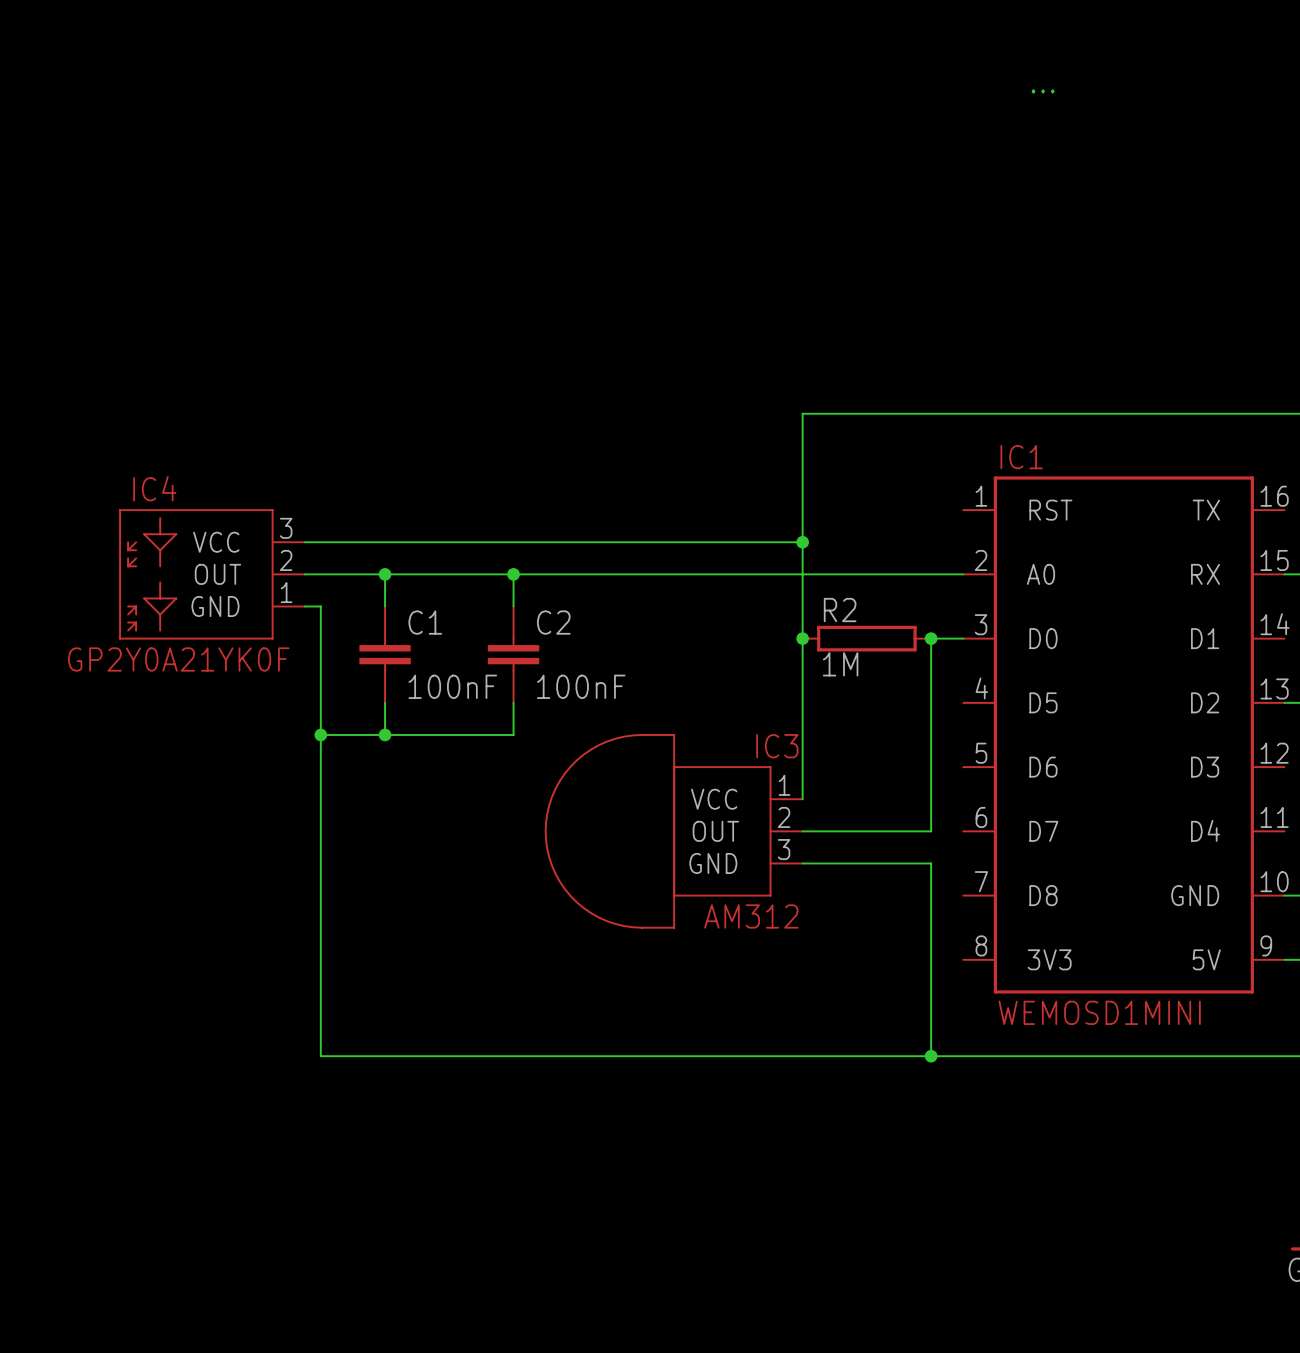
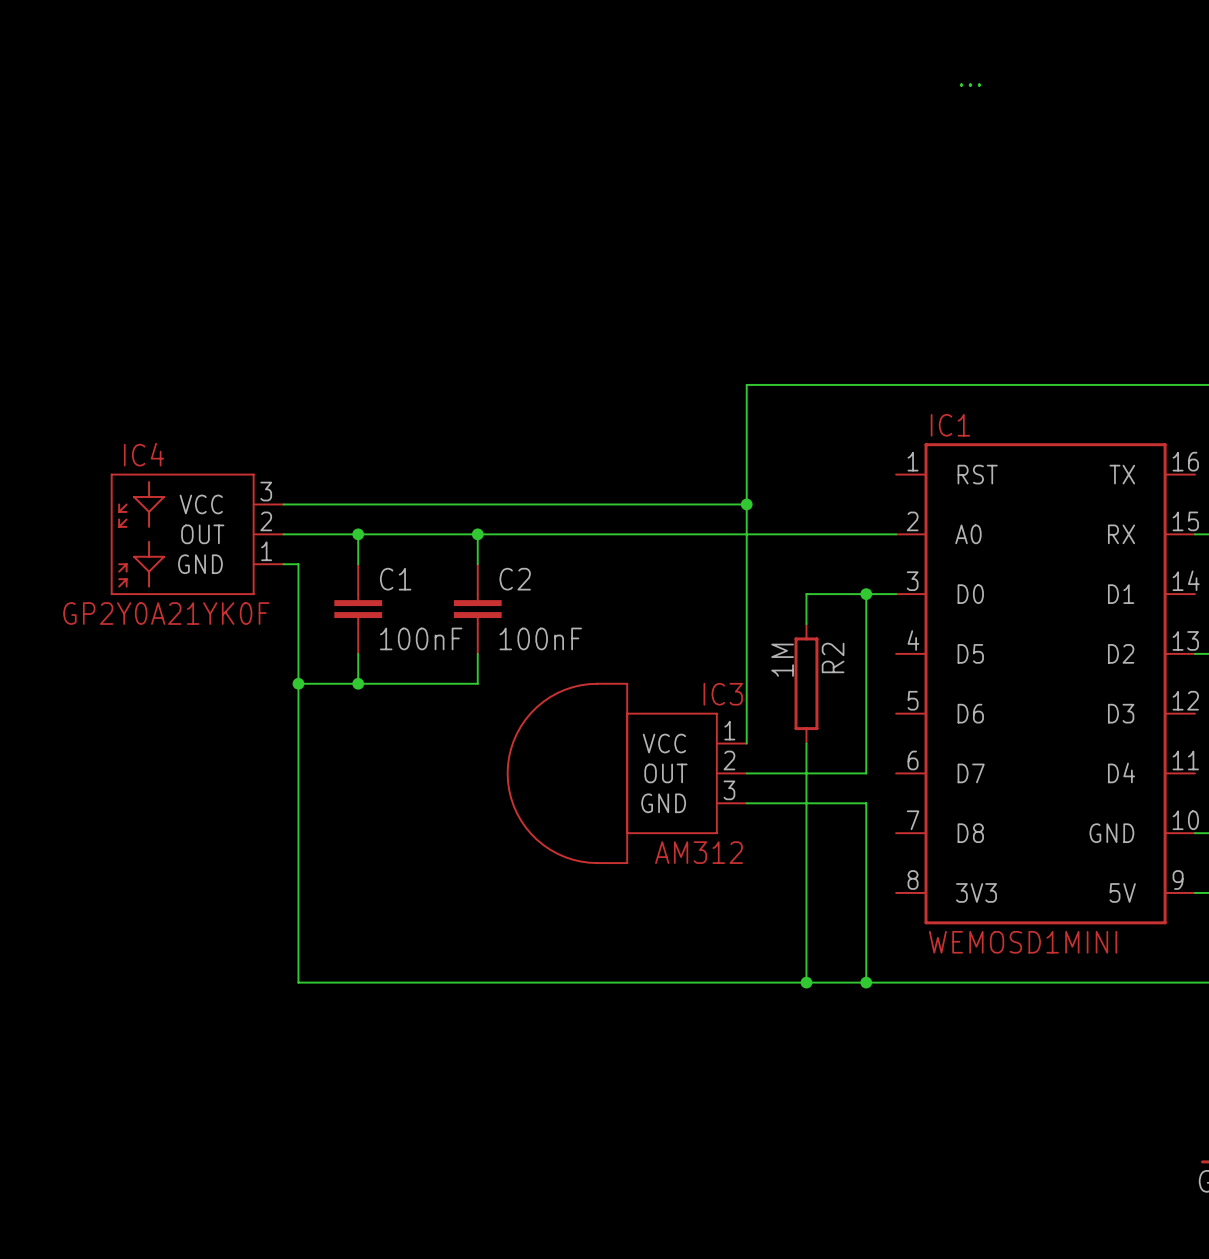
junction: (802, 638) -> none
R2 rotation: 0° (866, 638) -> 90° clockwise (806, 683)
R2 position: (866, 638) -> (806, 683)
wire: none -> (866, 594) (806, 594) (806, 624)
wire: none -> (806, 743) (806, 982)
junction: none -> (806, 982)

